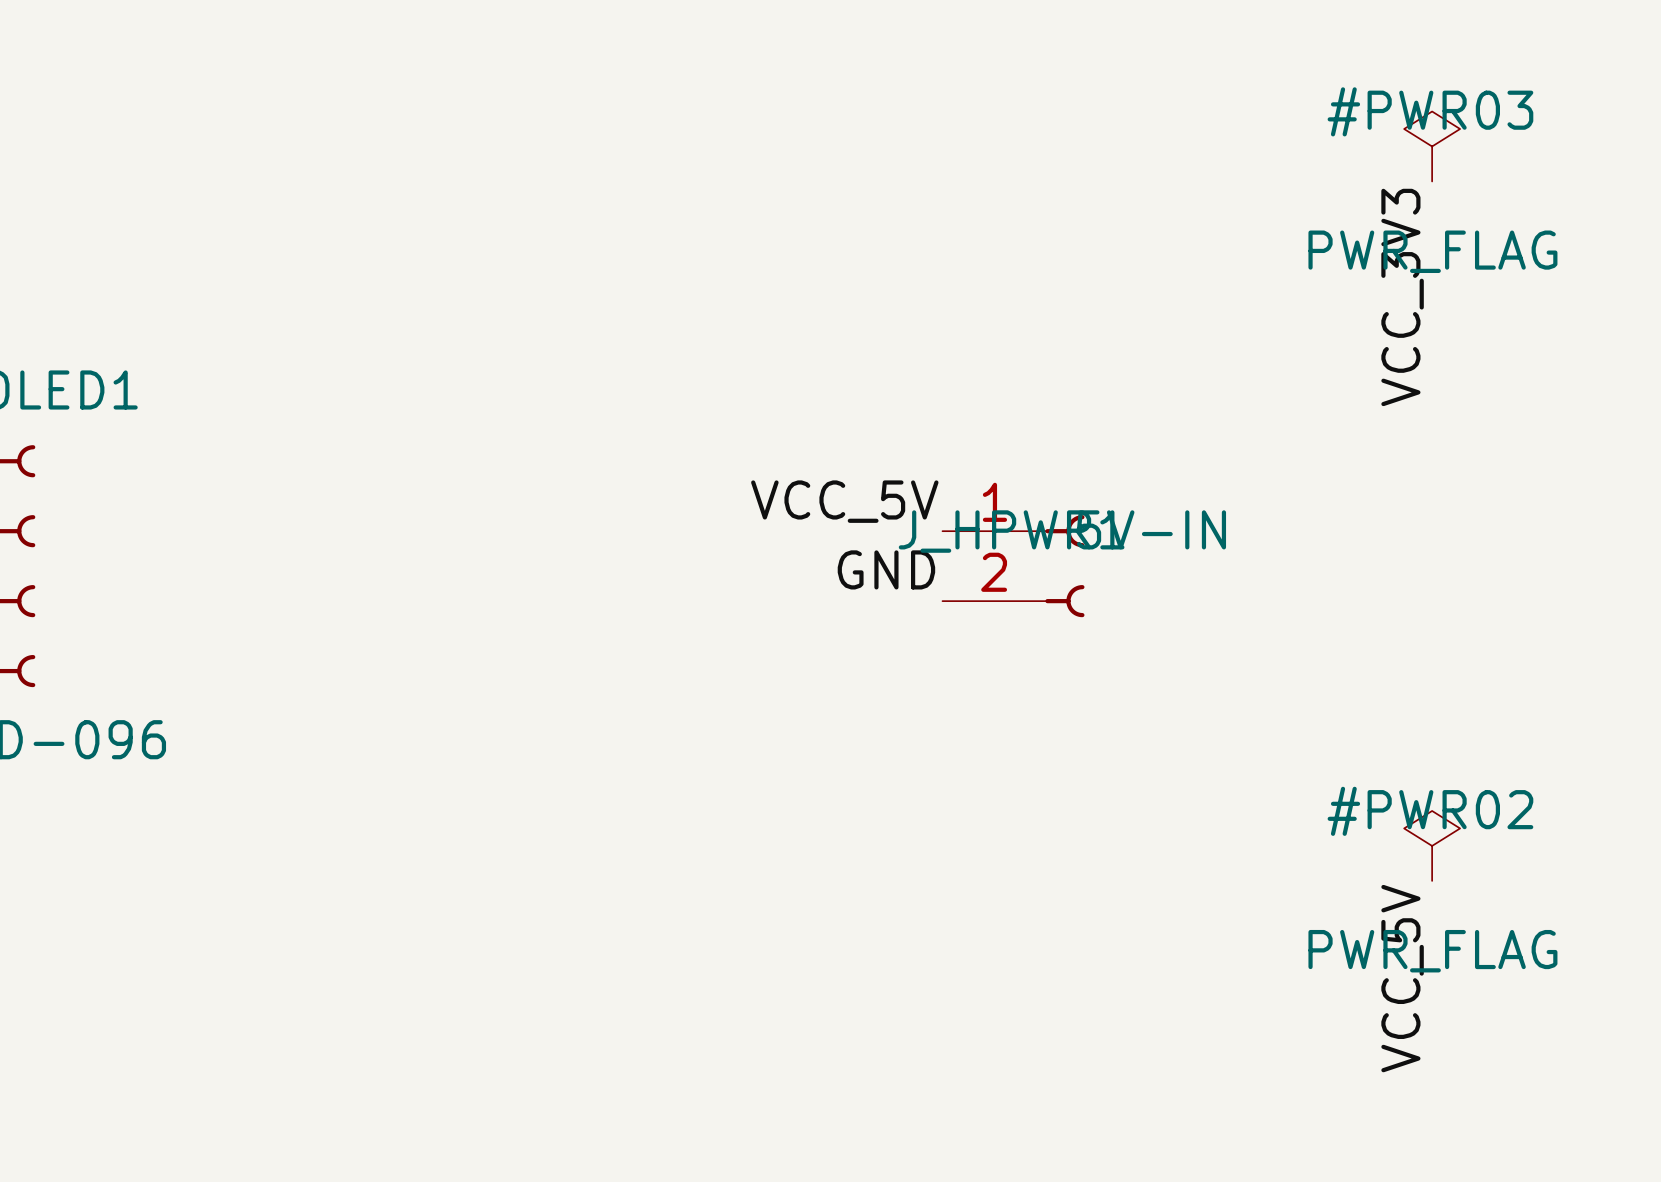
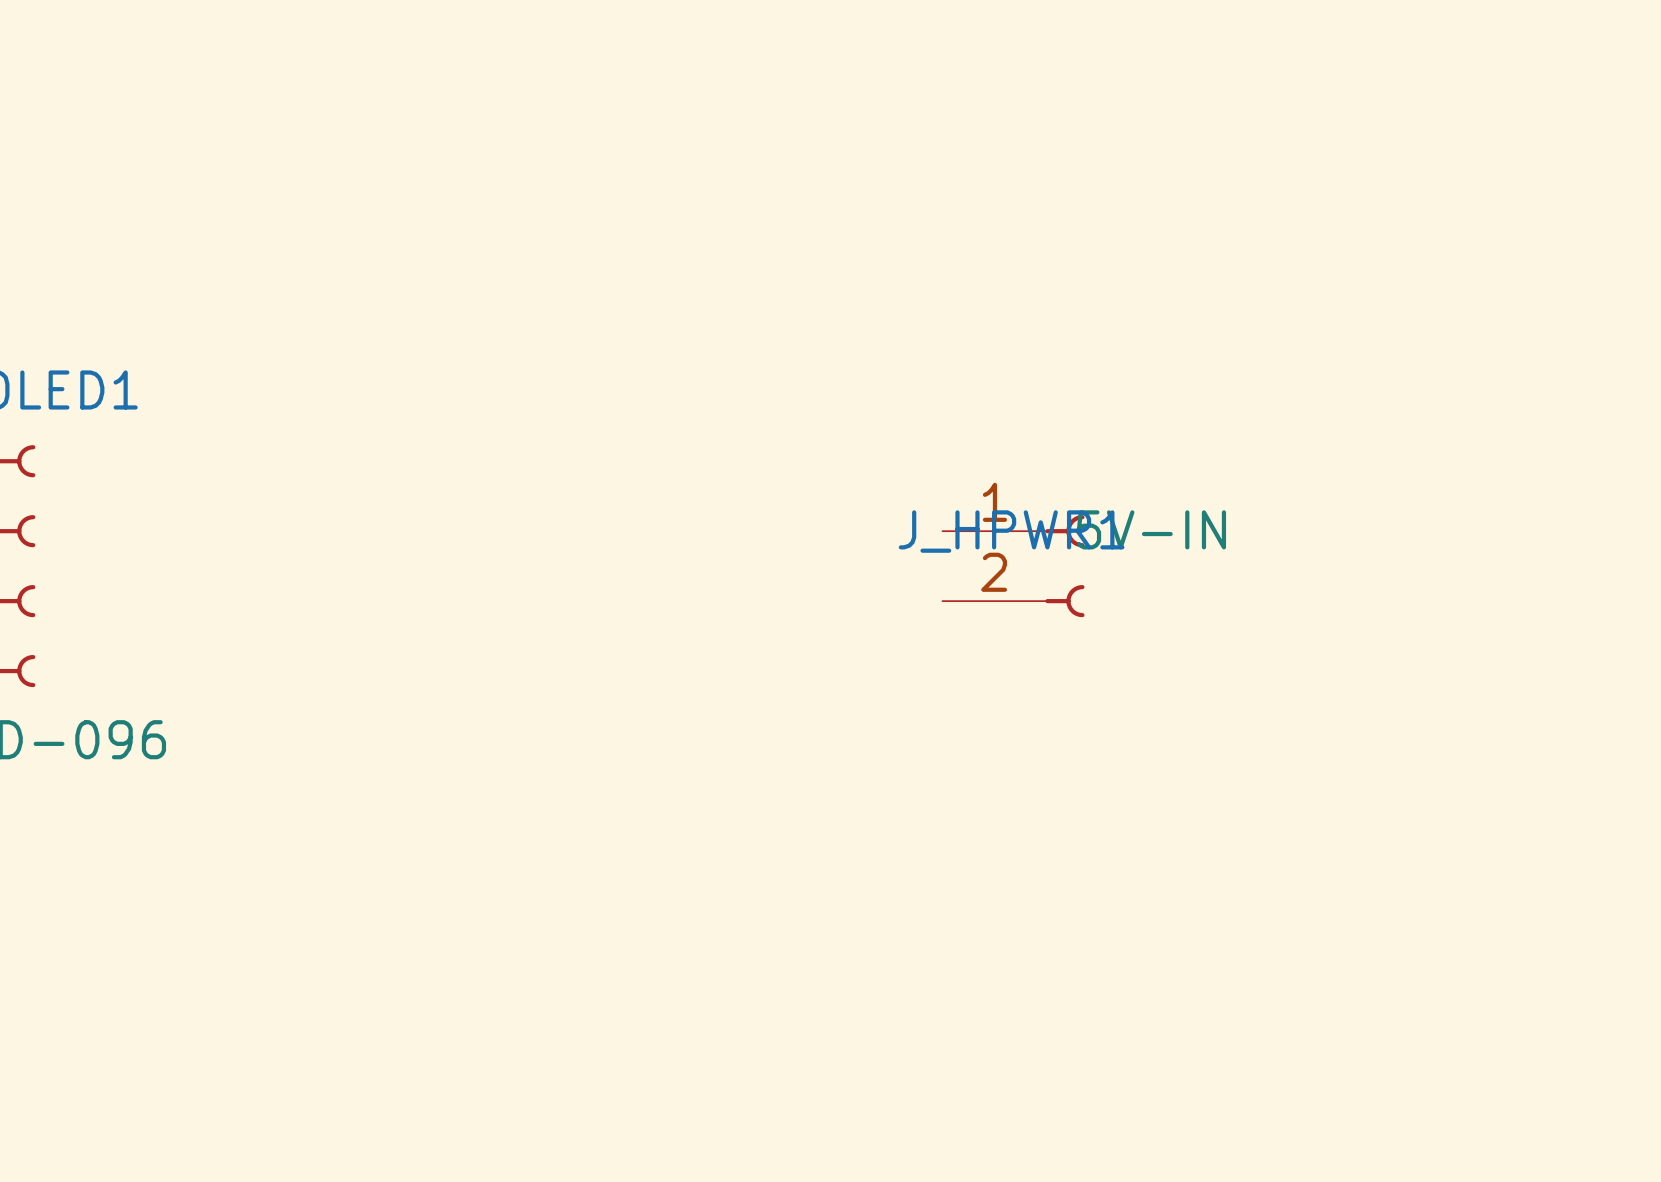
#PWR03: PWR_FLAG (1432, 146) -> none
label: VCC_3V3 (1402, 297) -> none
label: VCC_5V (844, 501) -> none
label: GND (886, 569) -> none
#PWR02: PWR_FLAG (1432, 845) -> none
label: VCC_5V (1402, 978) -> none

